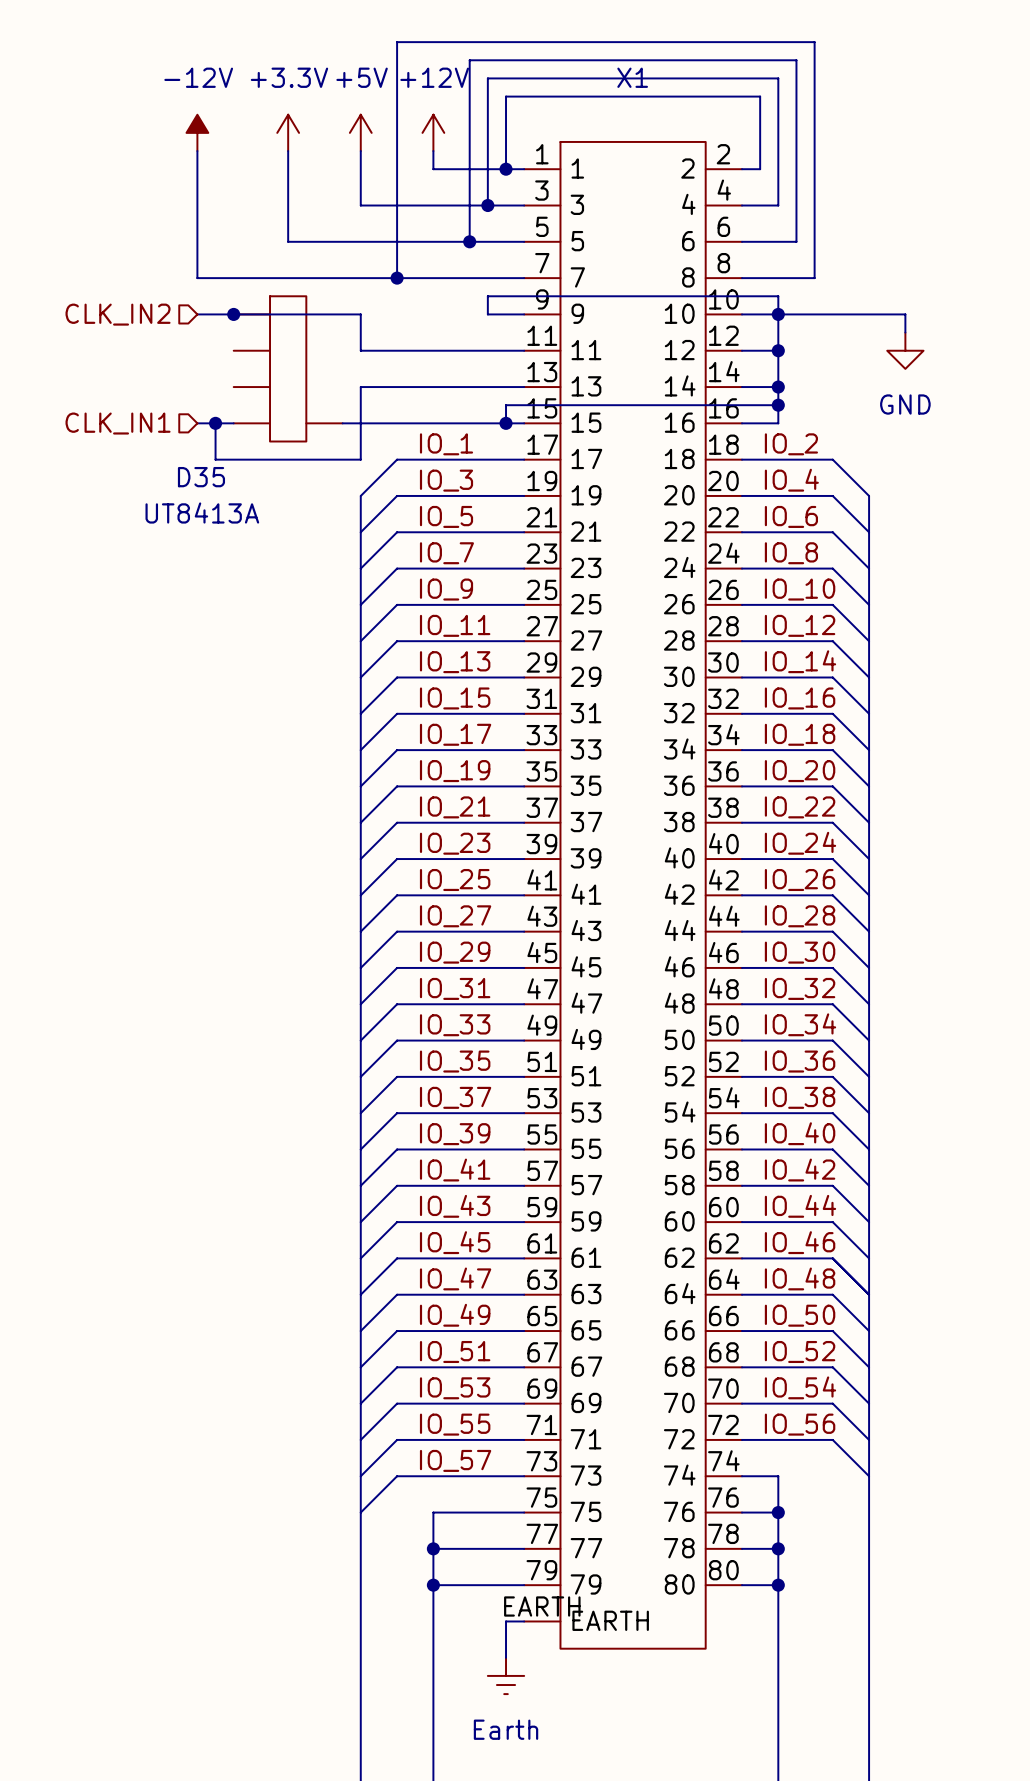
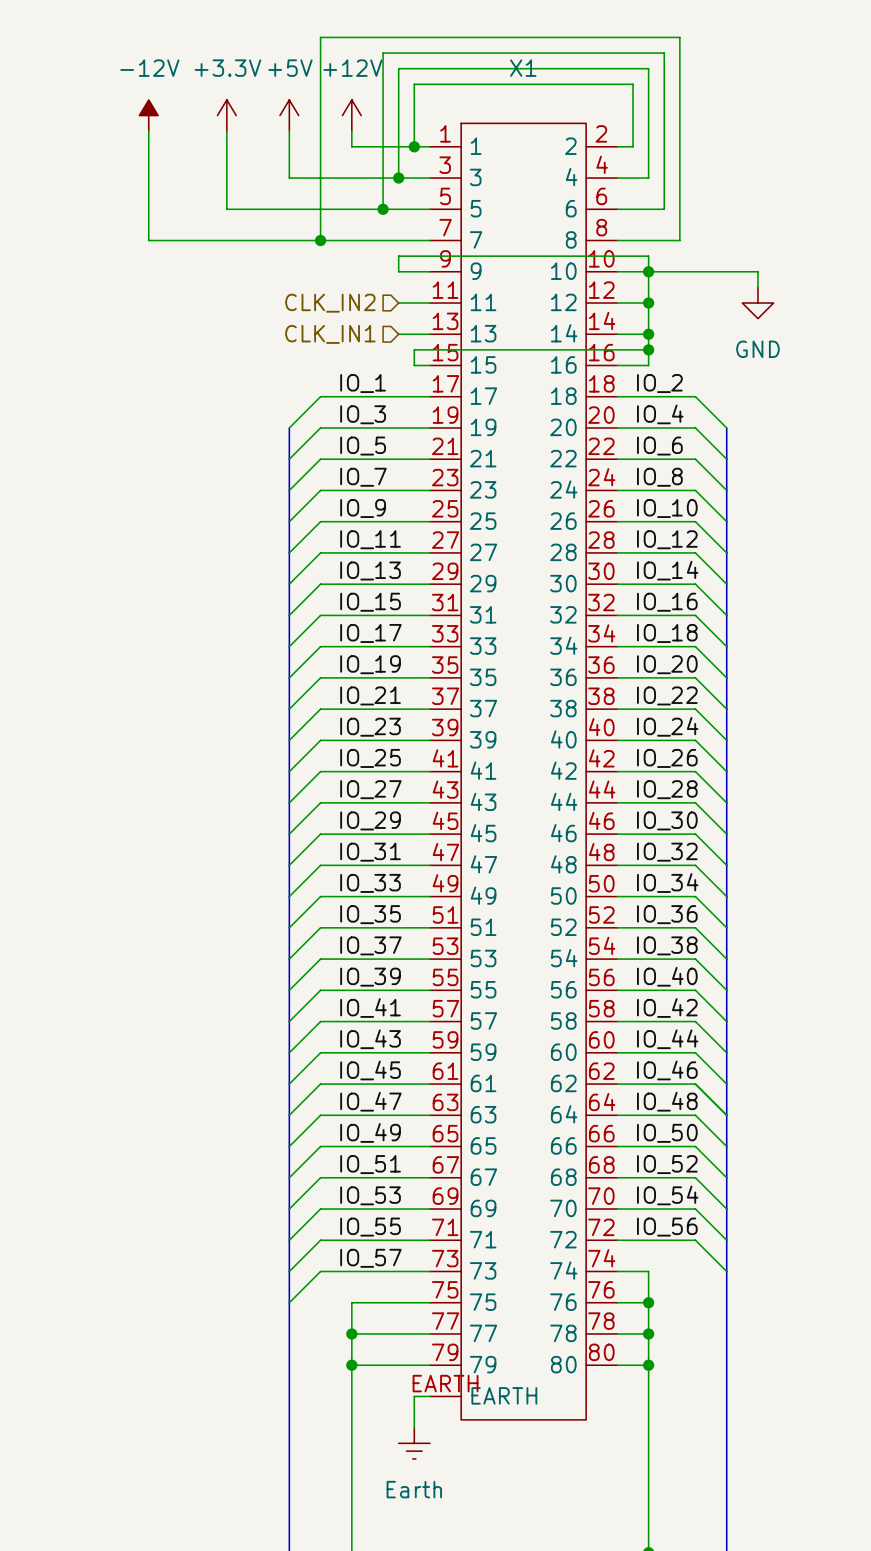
hierarchical label position: CLK_IN2 (118, 314) -> CLK_IN2 (330, 303)
wire: (197, 314) (360, 314) (360, 350) (487, 350) -> none
junction: (233, 314) -> none
D35: UT8413A (288, 368) -> none
wire: (487, 387) (360, 387) (360, 459) (215, 459) (215, 423) -> none
hierarchical label position: CLK_IN1 (118, 423) -> CLK_IN1 (330, 334)
wire: (197, 423) (233, 423) -> none
junction: (215, 423) -> none
wire: (342, 423) (506, 423) -> none
junction: (506, 423) -> none

